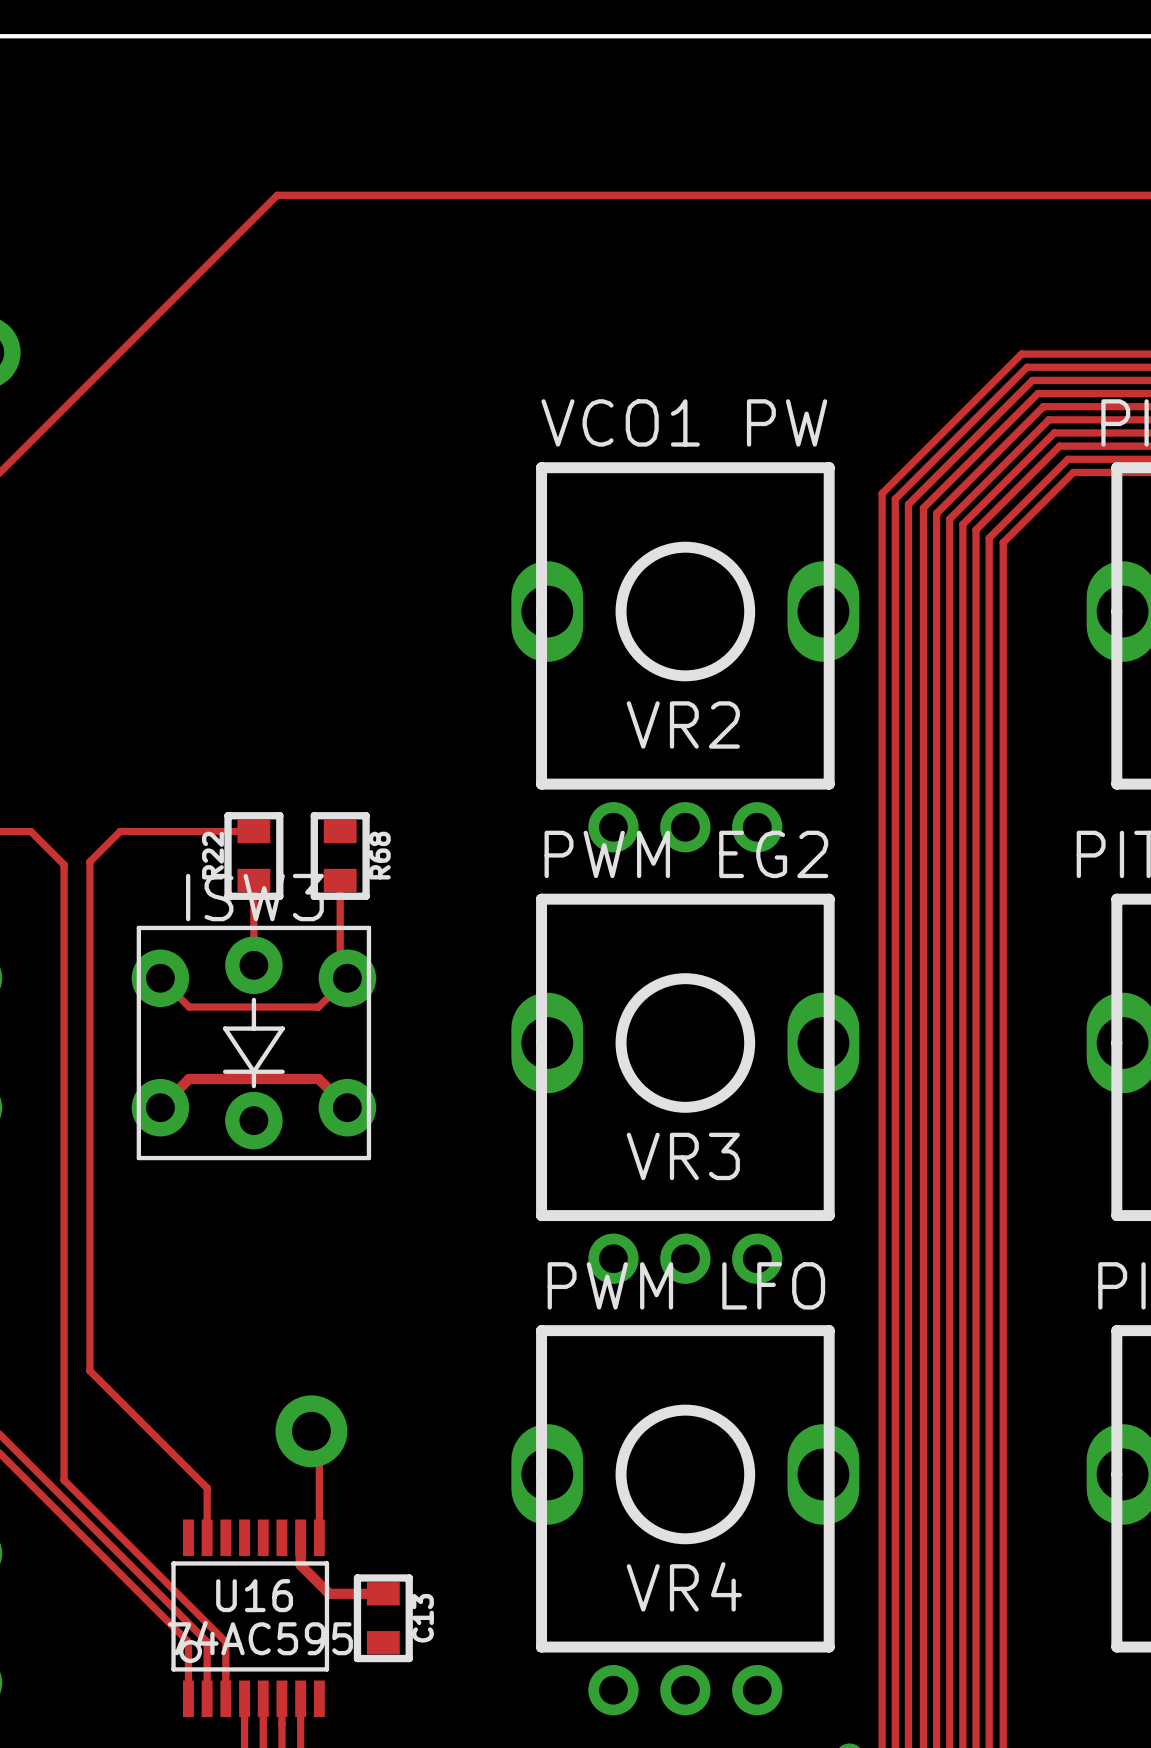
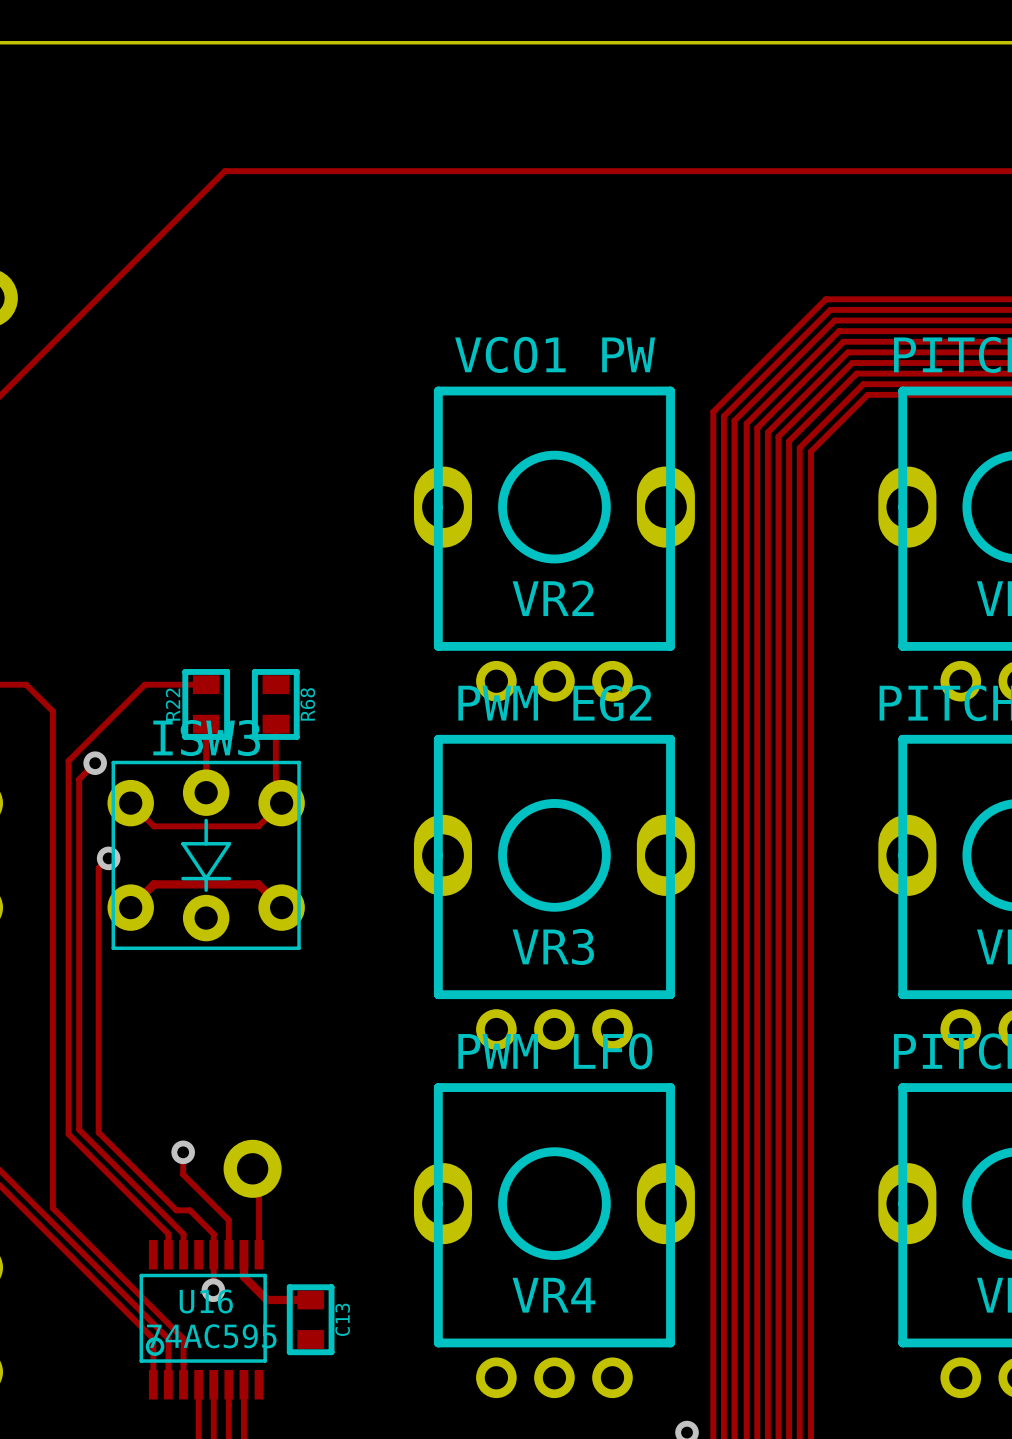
track: (177, 831) (120, 831) (89, 861) (89, 1370) (207, 1488) (207, 1512) -> (144, 684) (68, 761) (68, 1134) (168, 1234)
track: none -> (95, 763) (79, 779) (79, 1129) (183, 1234) (183, 1254)
via: none -> (95, 763)
track: none -> (108, 858) (98, 868) (98, 1132) (176, 1210) (189, 1210) (213, 1234) (213, 1290)
via: none -> (108, 858)
track: none -> (183, 1152) (183, 1174) (228, 1220) (228, 1254)
via: none -> (183, 1152)
via: none -> (213, 1290)

